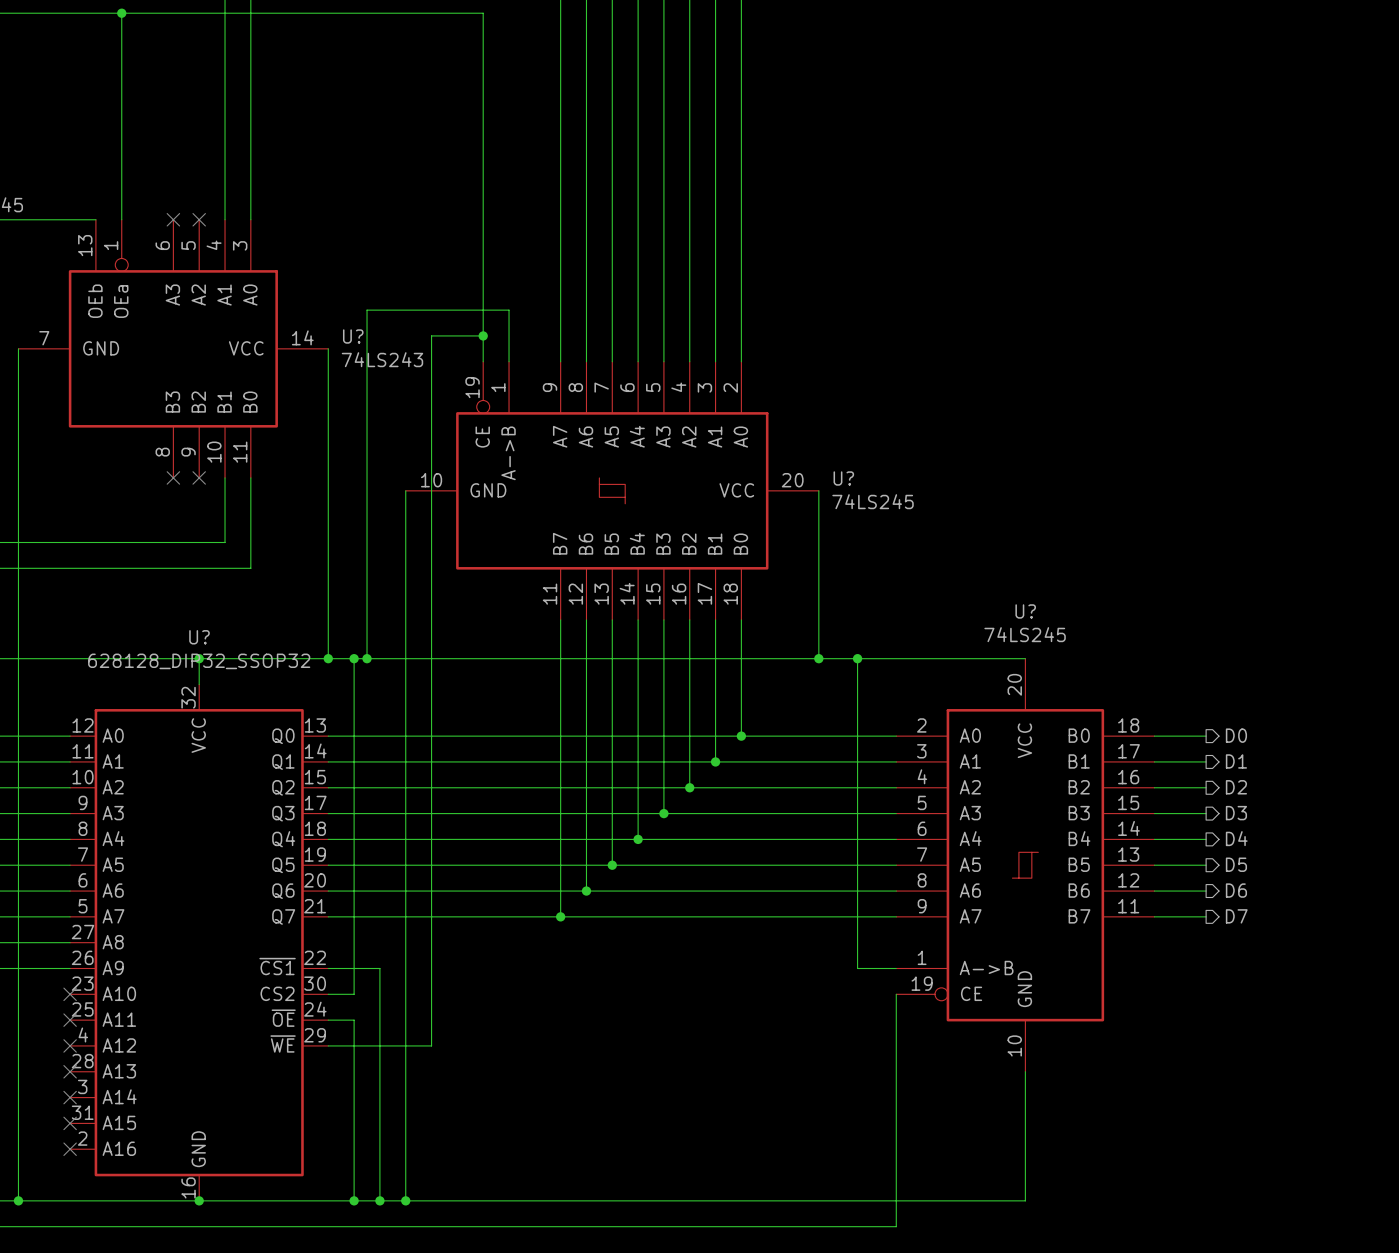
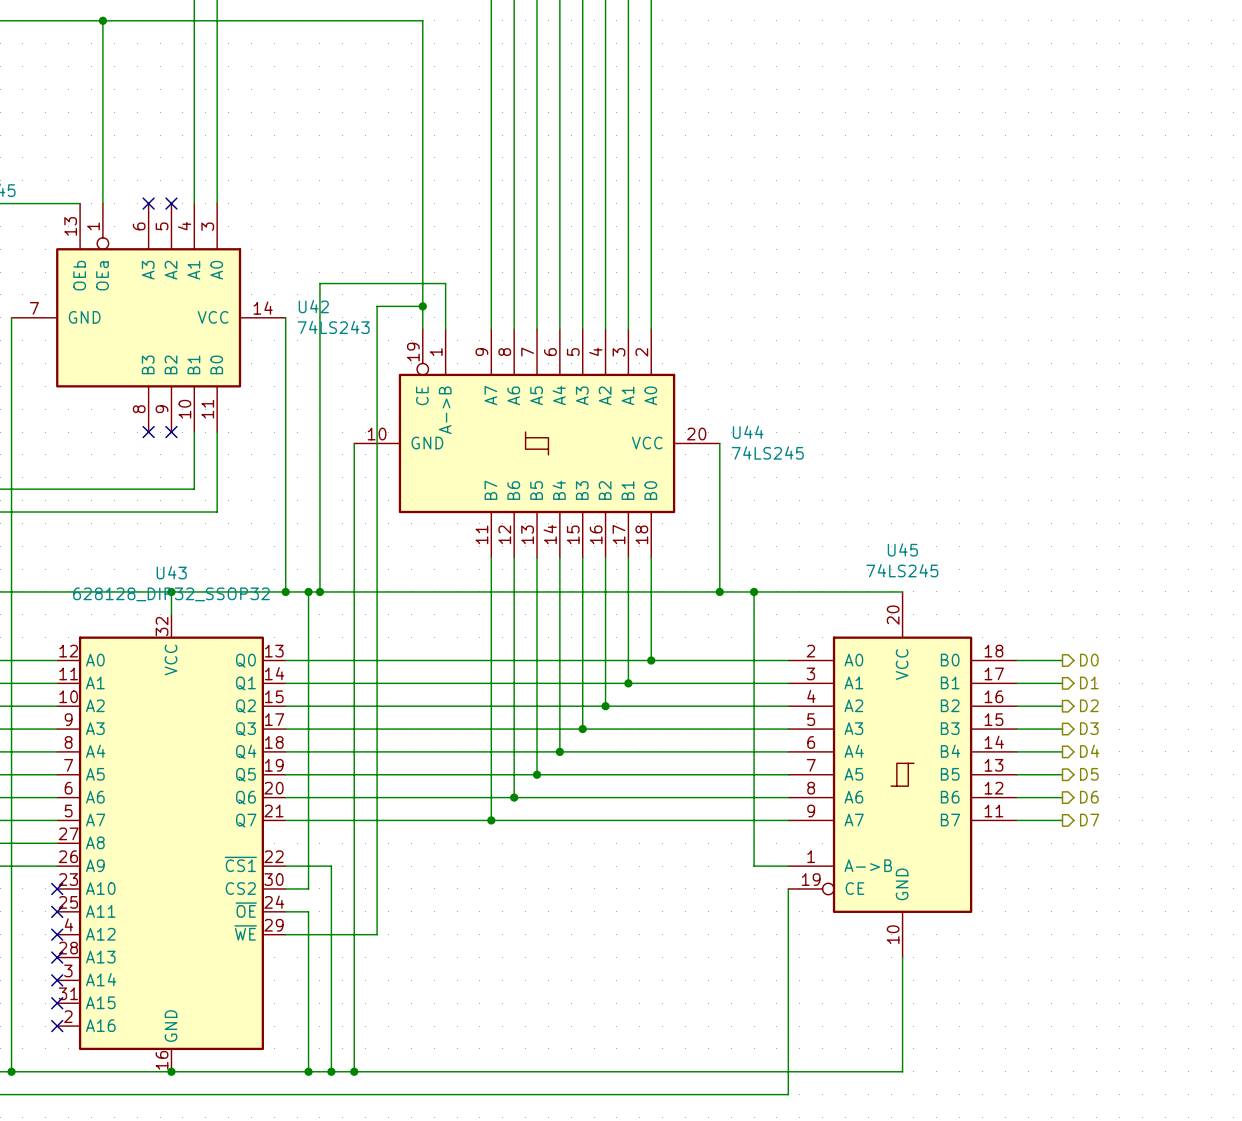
U? name: U? (353, 336) -> U42 (313, 306)
U? name: U? (843, 478) -> U44 (748, 432)
U? name: U? (1025, 611) -> U45 (902, 549)
U? name: U? (199, 637) -> U43 (171, 572)

